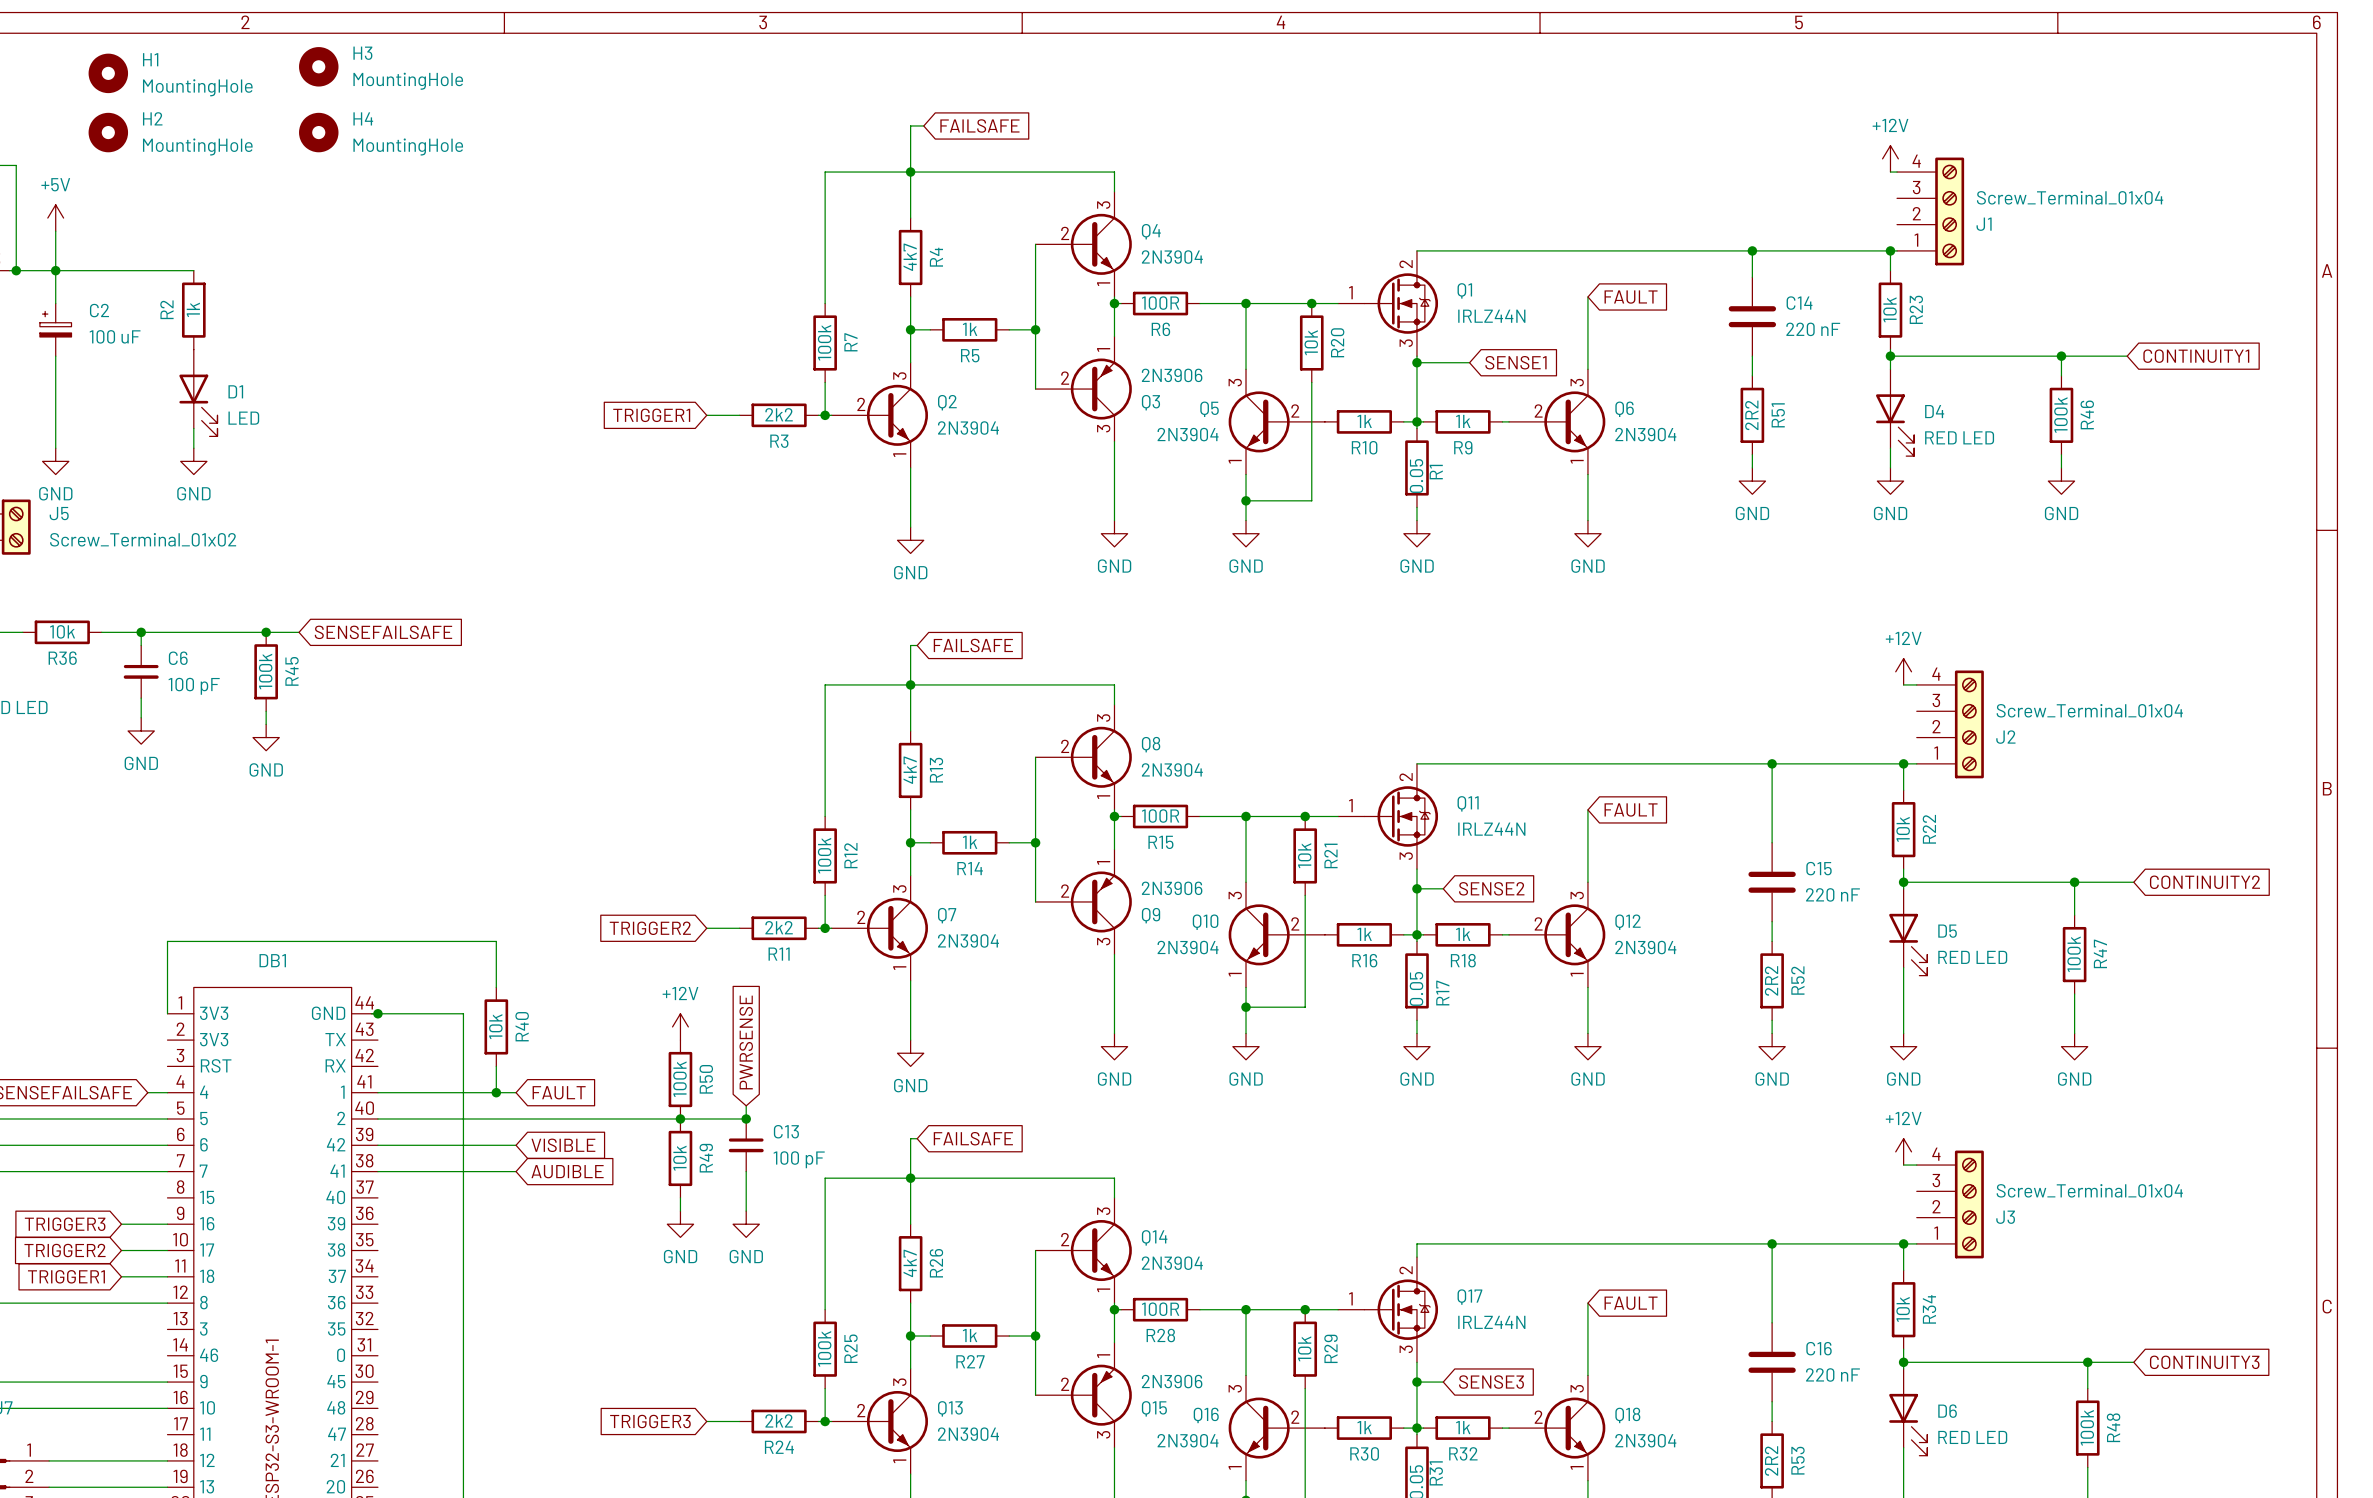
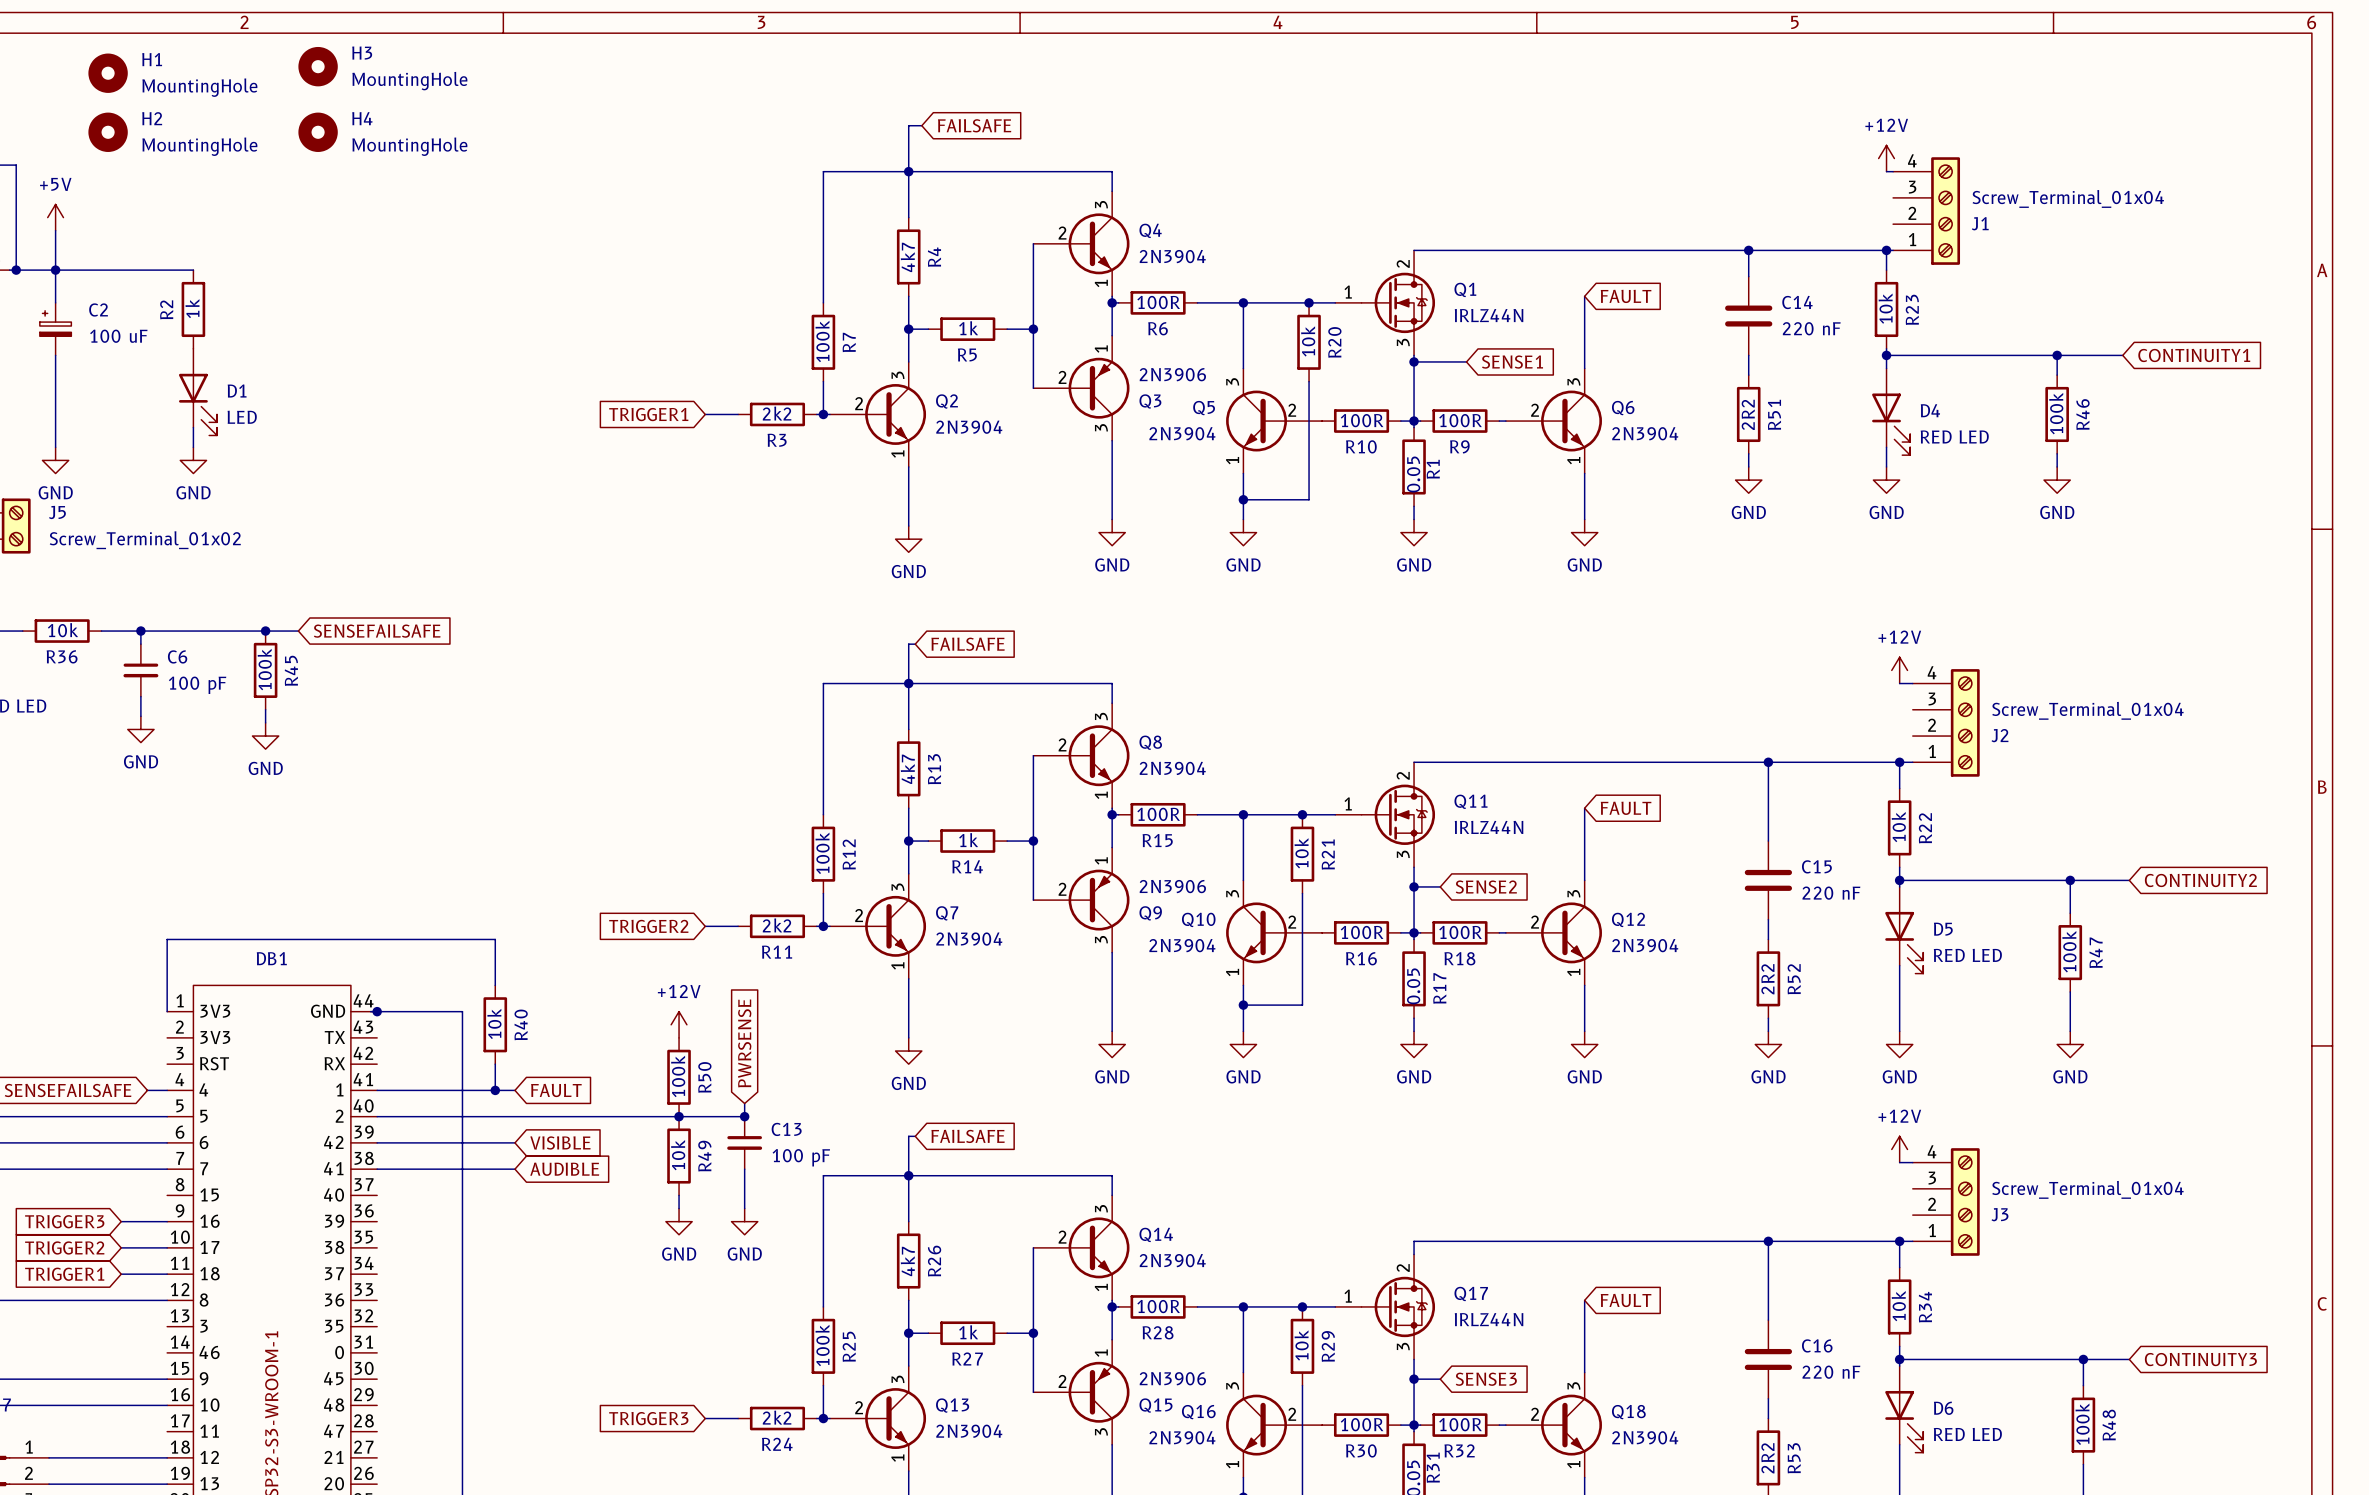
R10 value: 1k (1364, 421) -> 100R (1362, 420)
R9 value: 1k (1463, 421) -> 100R (1460, 420)
R16 value: 1k (1364, 934) -> 100R (1362, 932)
R18 value: 1k (1463, 934) -> 100R (1460, 932)
R30 value: 1k (1364, 1427) -> 100R (1362, 1424)
R32 value: 1k (1463, 1427) -> 100R (1460, 1424)

